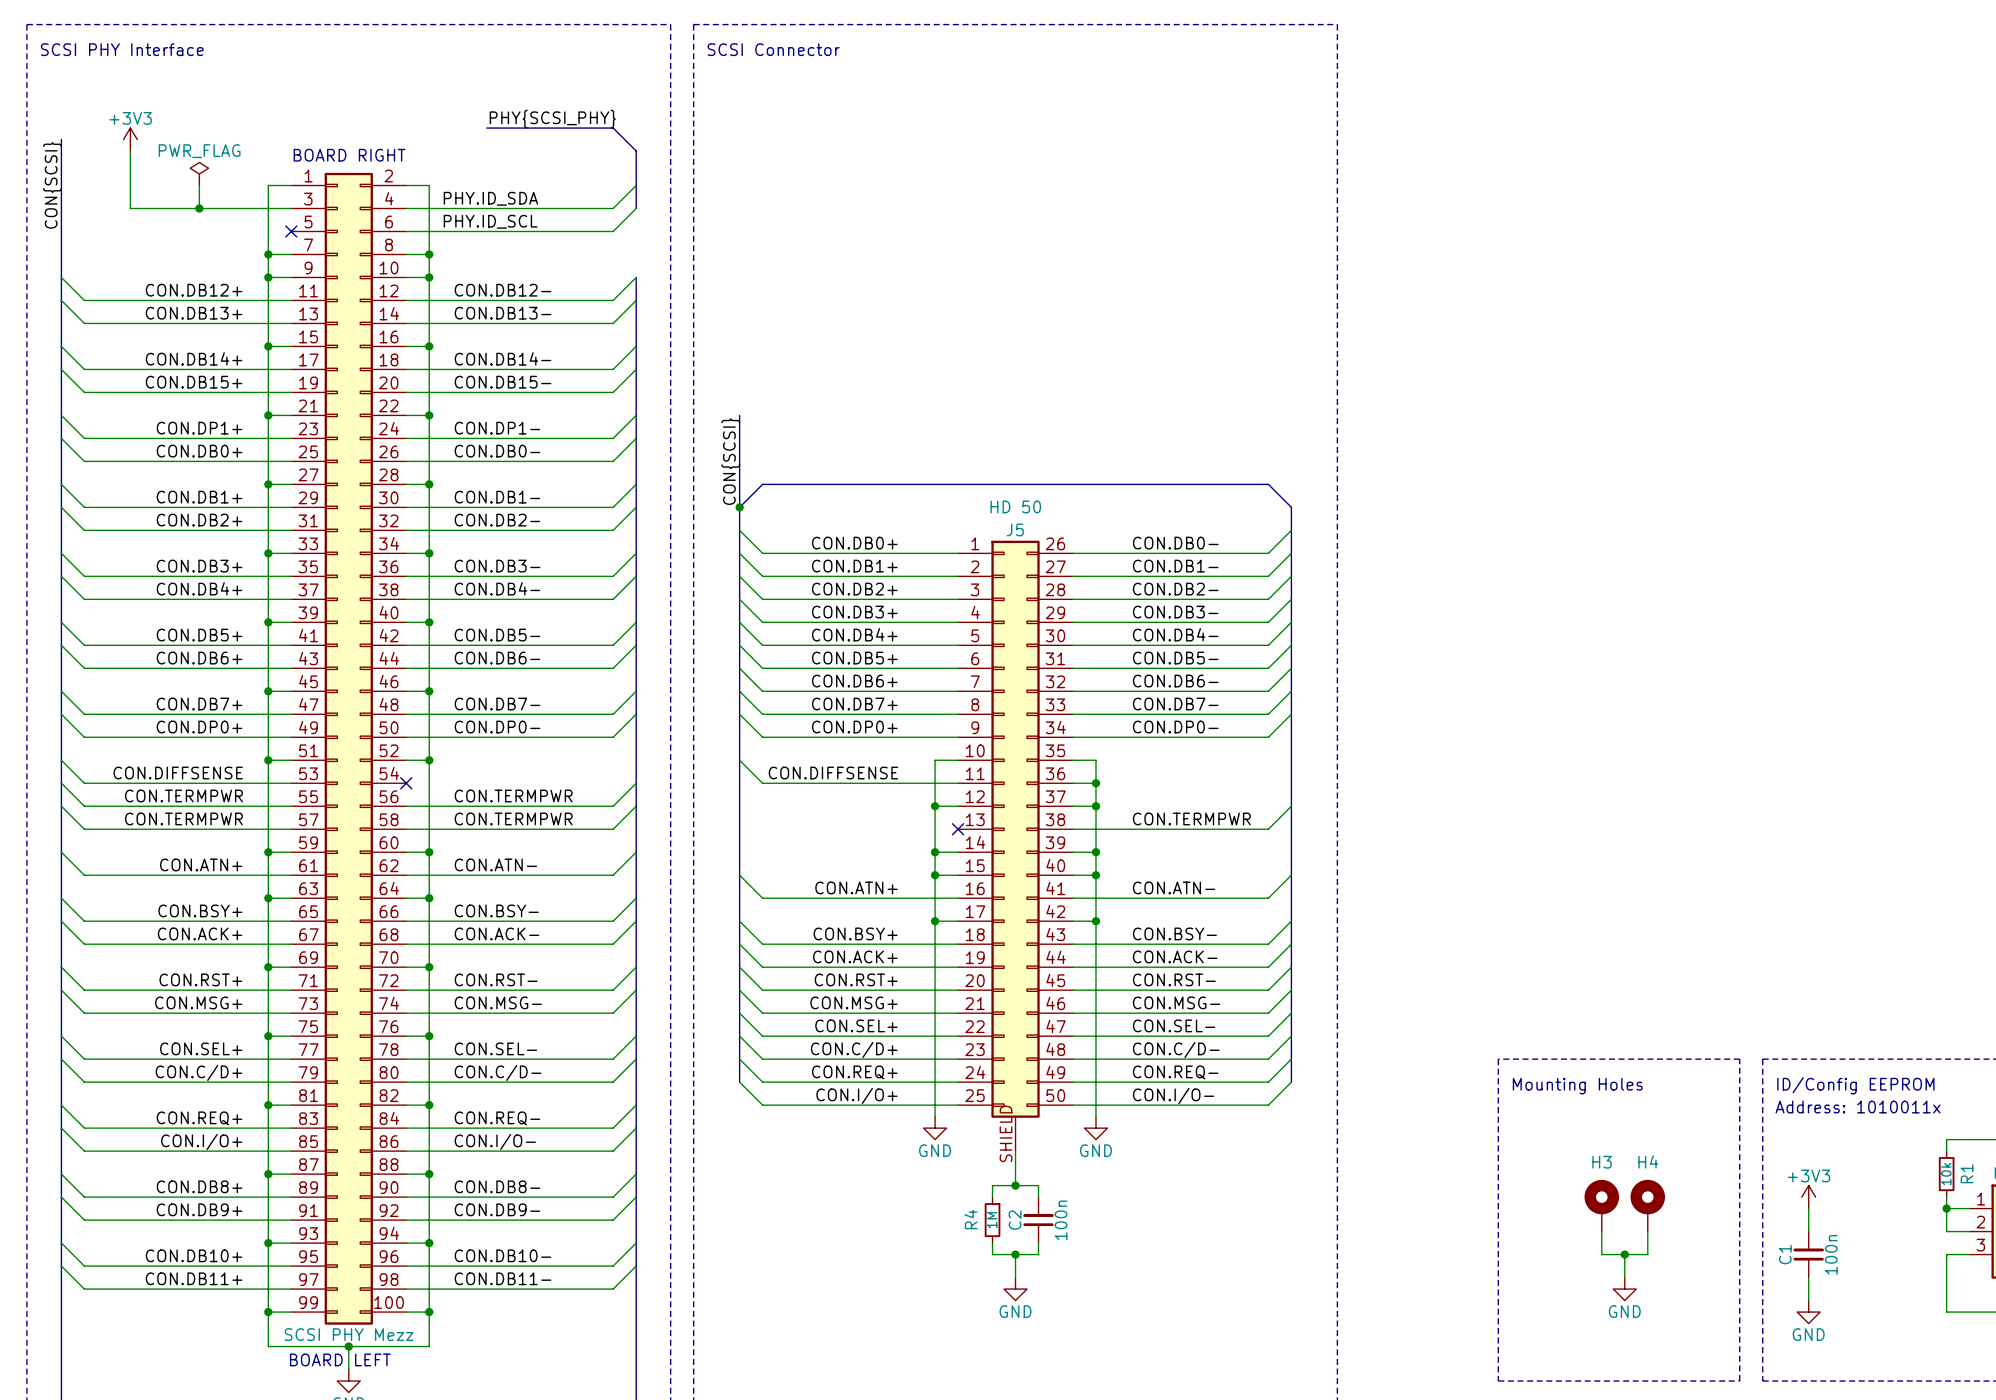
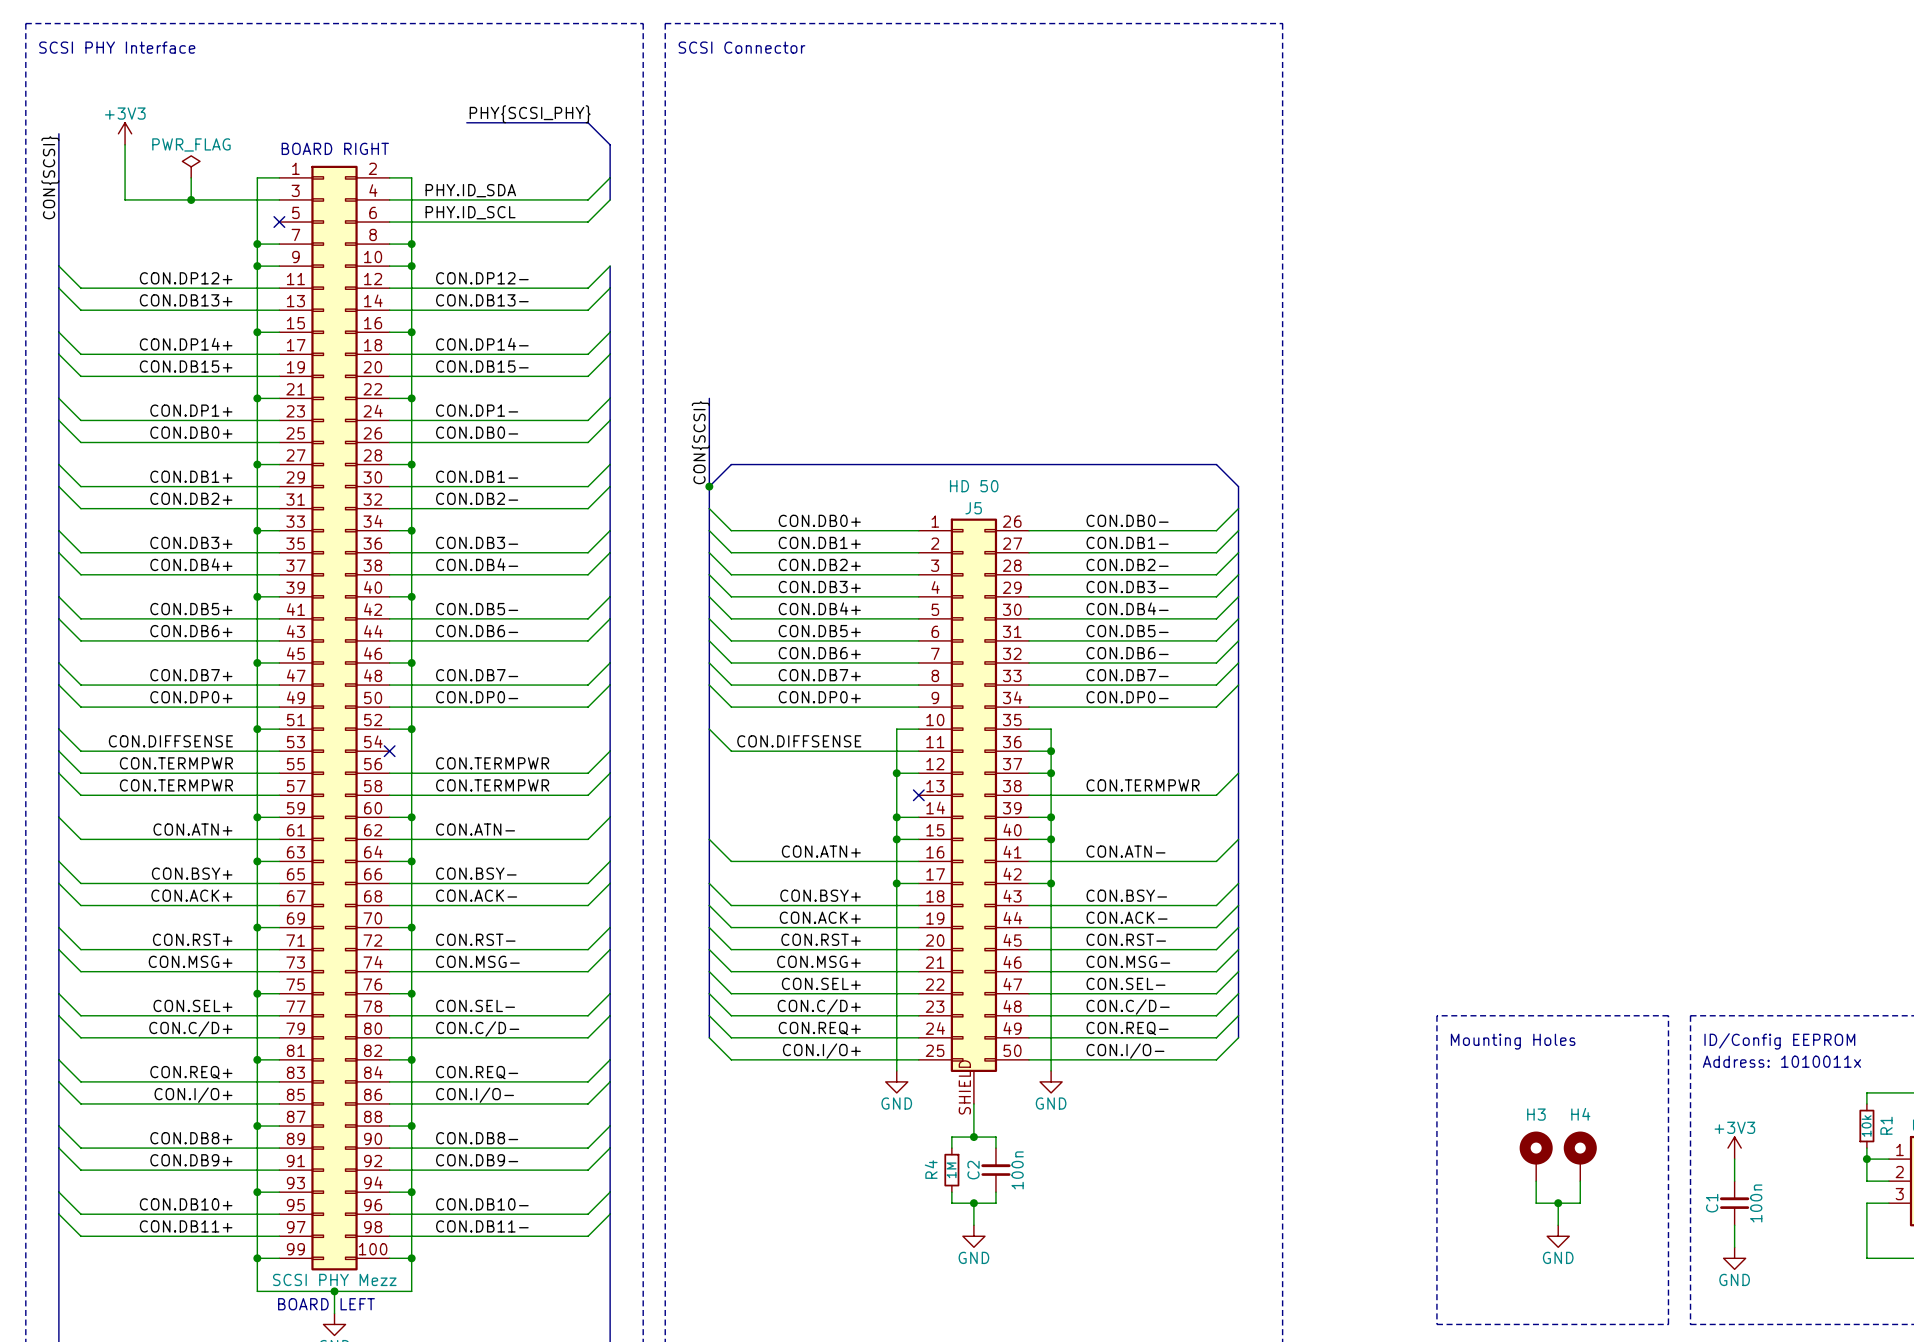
label: CON.DB12+ (194, 290) -> CON.DP12+ (186, 278)
label: CON.DB12- (502, 290) -> CON.DP12- (482, 278)
label: CON.DB14+ (194, 358) -> CON.DP14+ (186, 344)
label: CON.DB14- (502, 358) -> CON.DP14- (482, 344)

